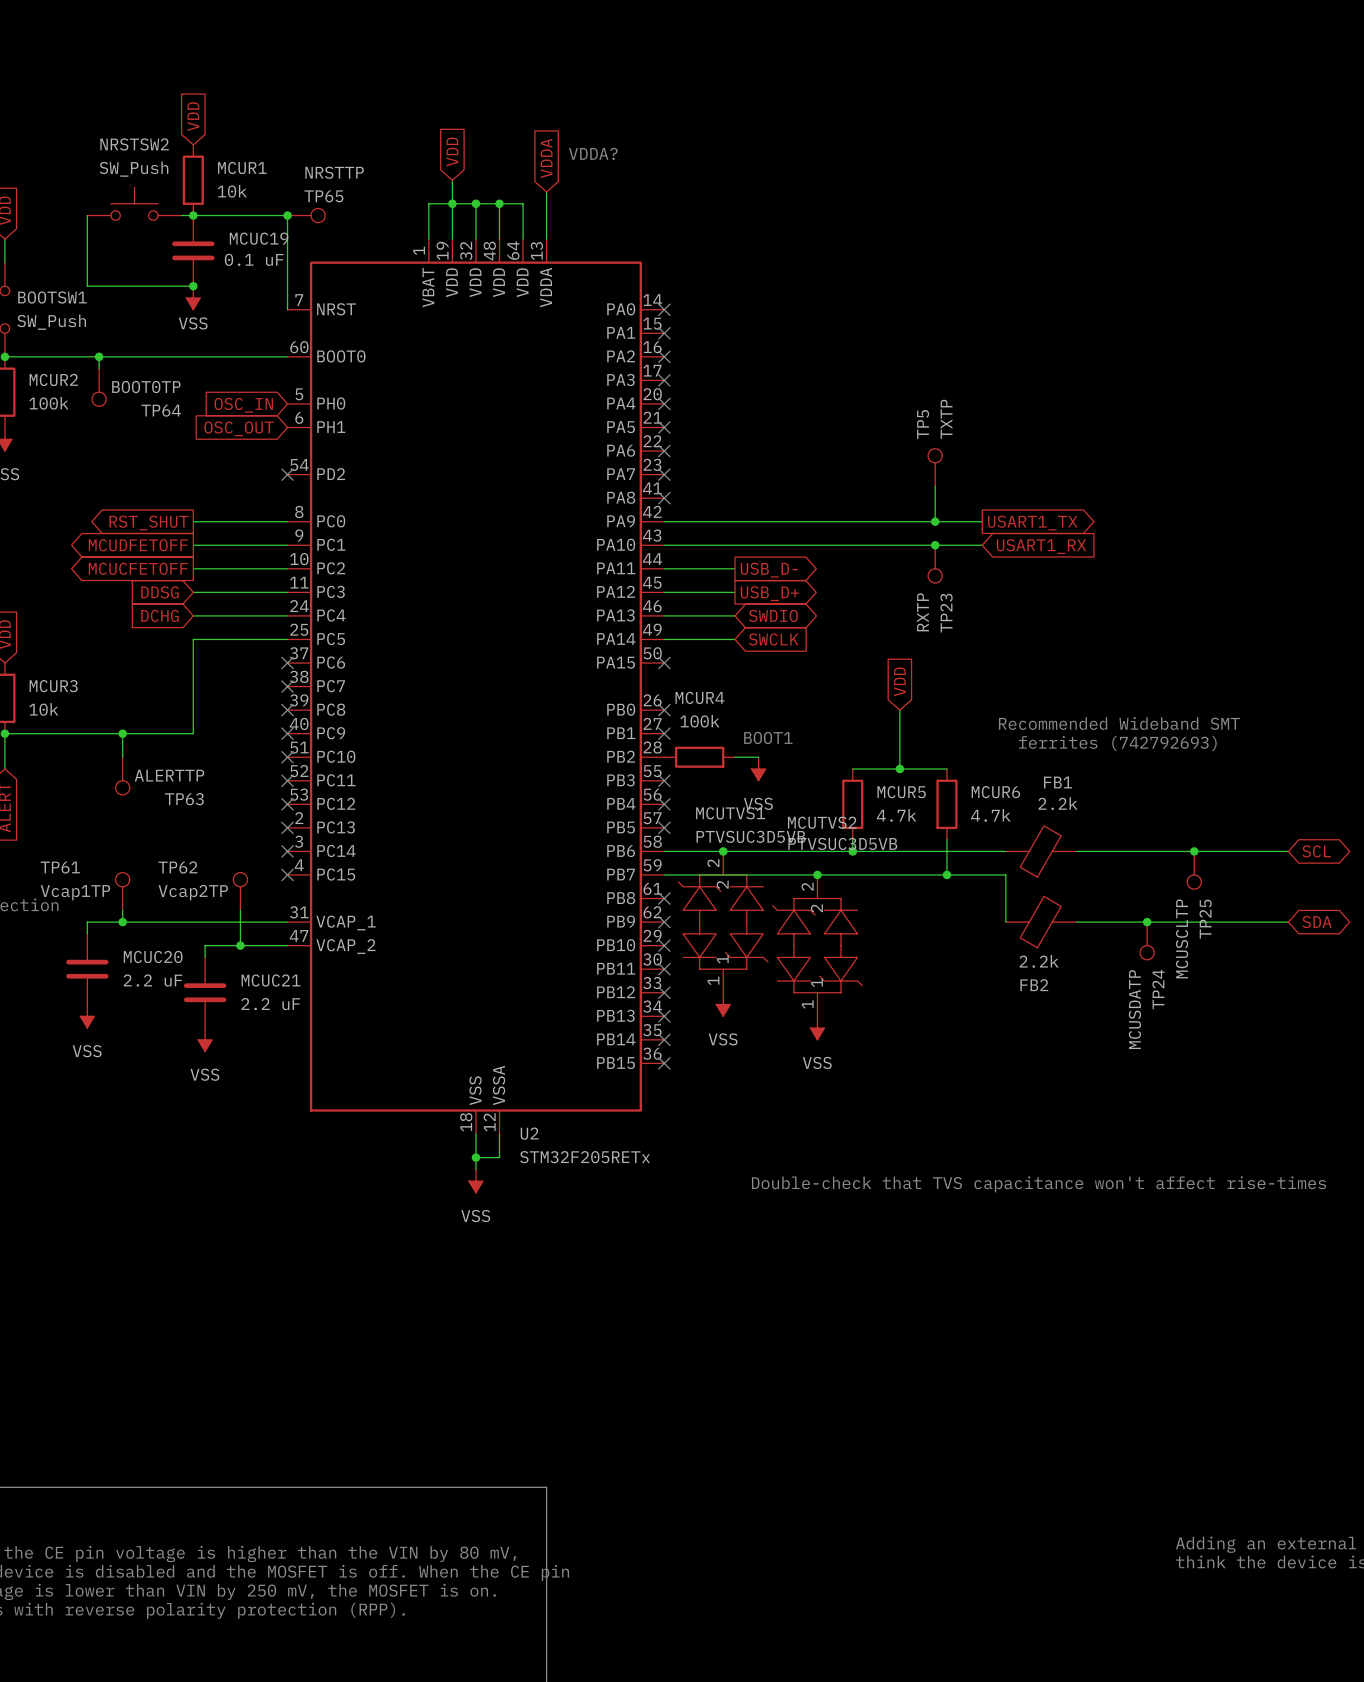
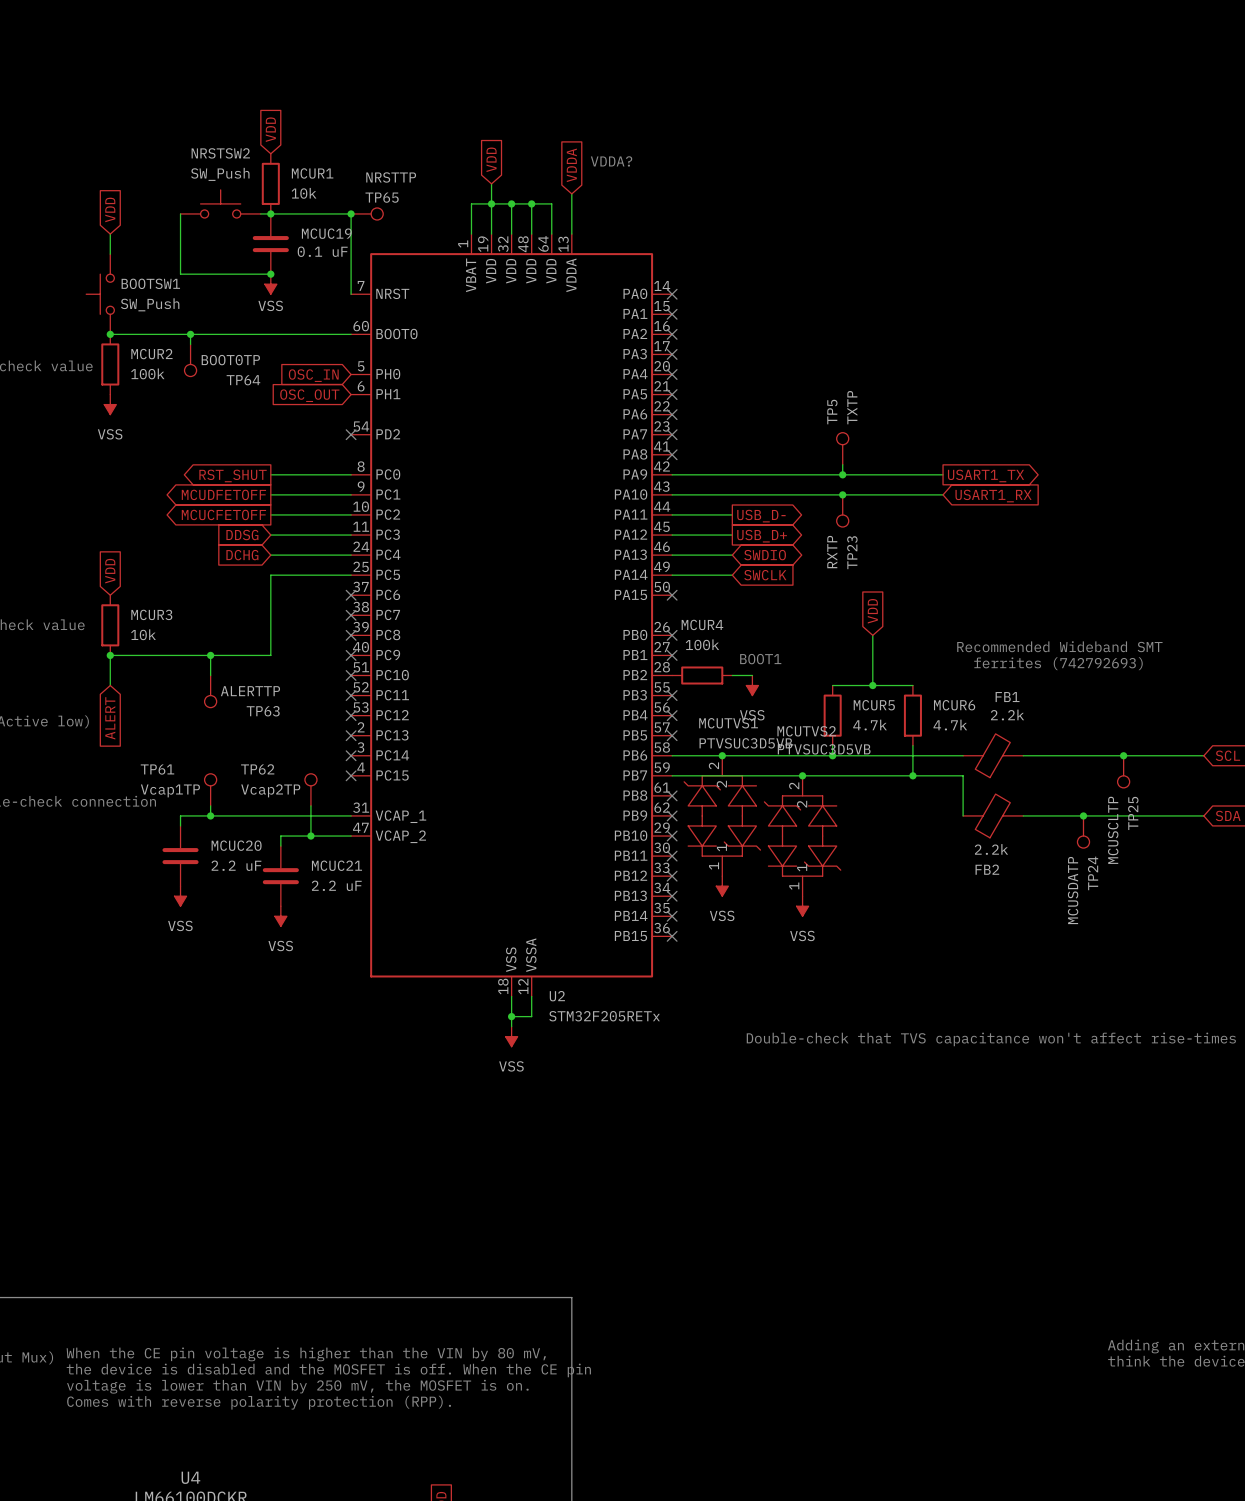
TP5 position: (935, 467) -> (842, 448)
wire: (935, 486) (935, 521) -> none
wire: none -> (842, 464) (842, 474)
junction: none -> (842, 474)
junction: (935, 521) -> none
junction: none -> (842, 494)
junction: (935, 545) -> none
TP23 position: (935, 564) -> (842, 510)

